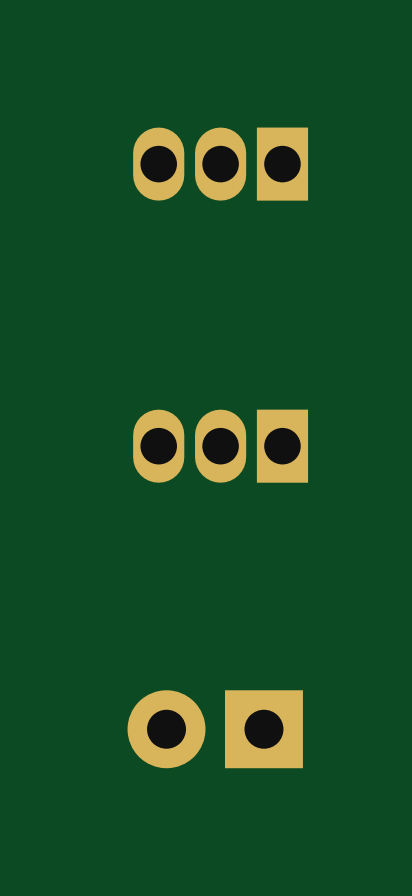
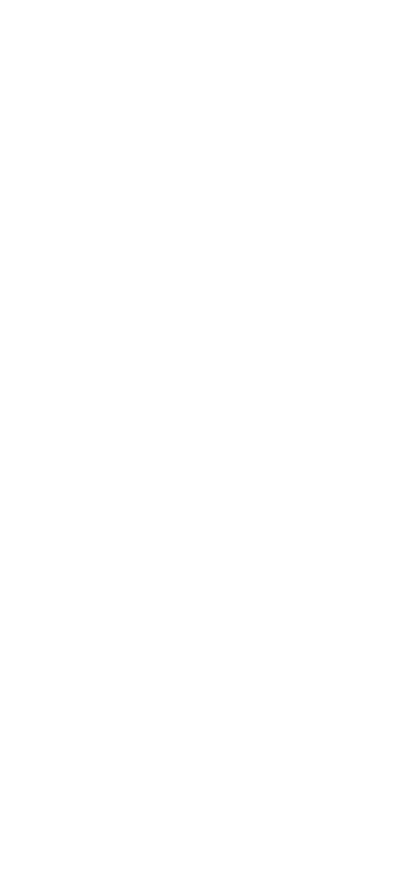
part: (220, 164) -> none
part: (220, 446) -> none
part: (215, 729) -> none

